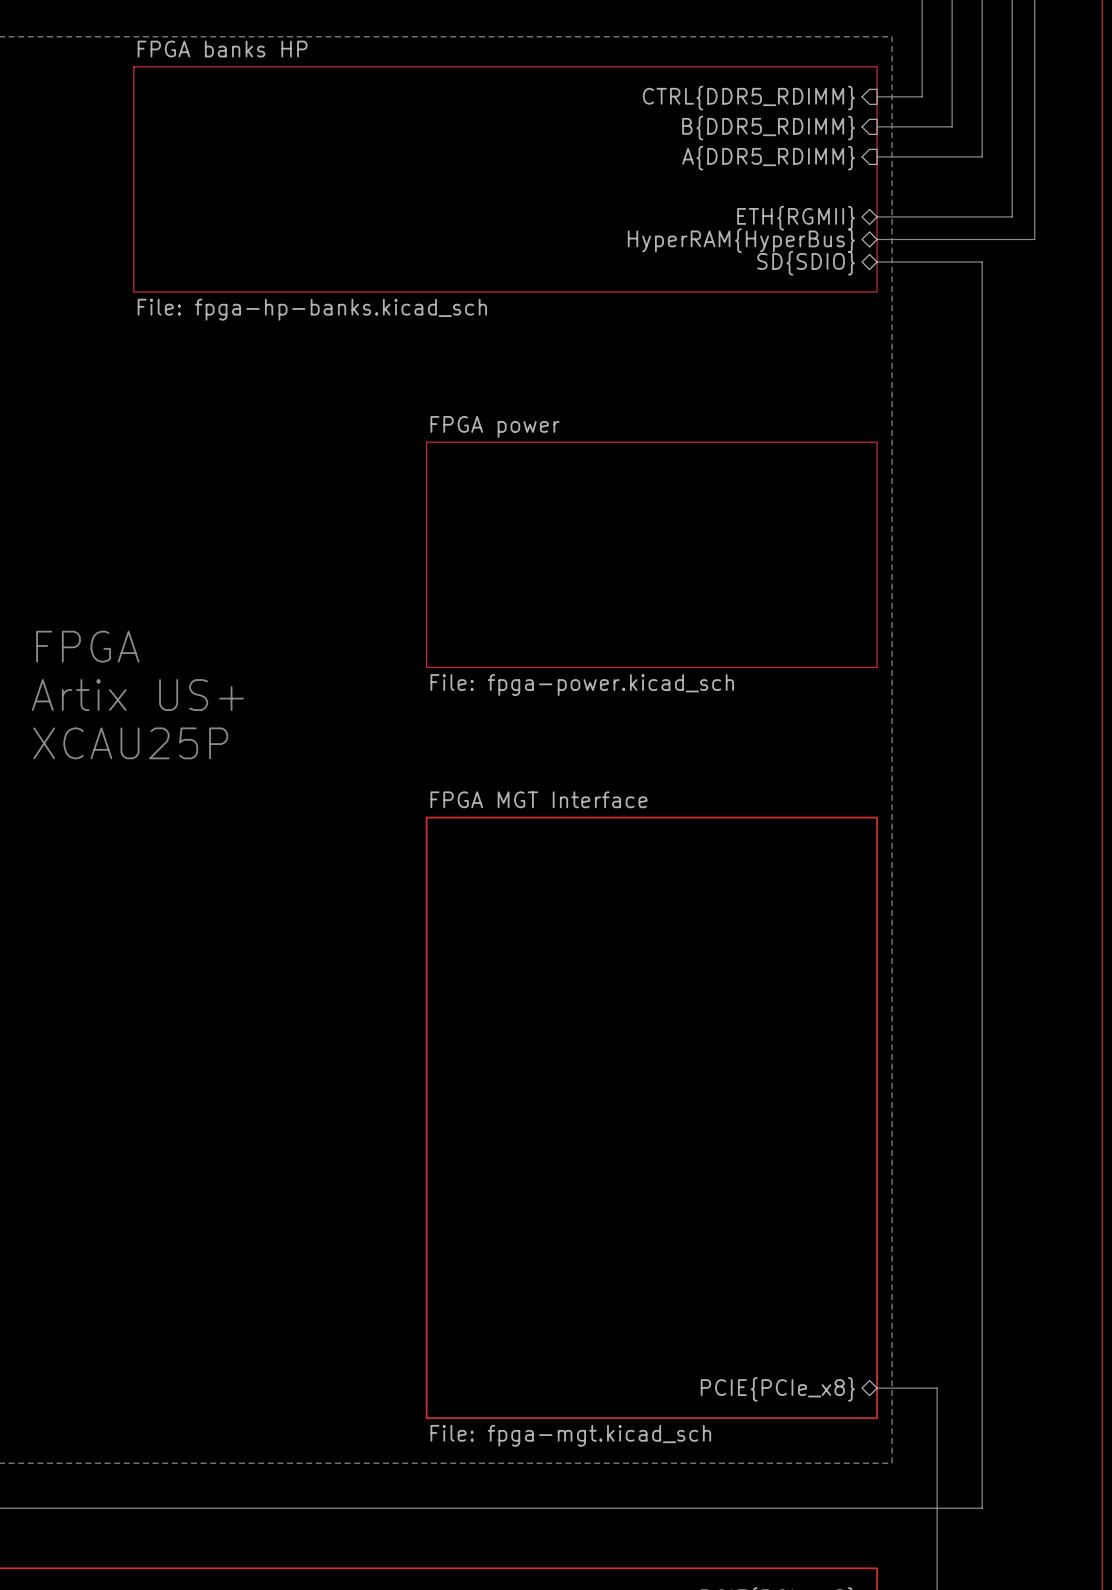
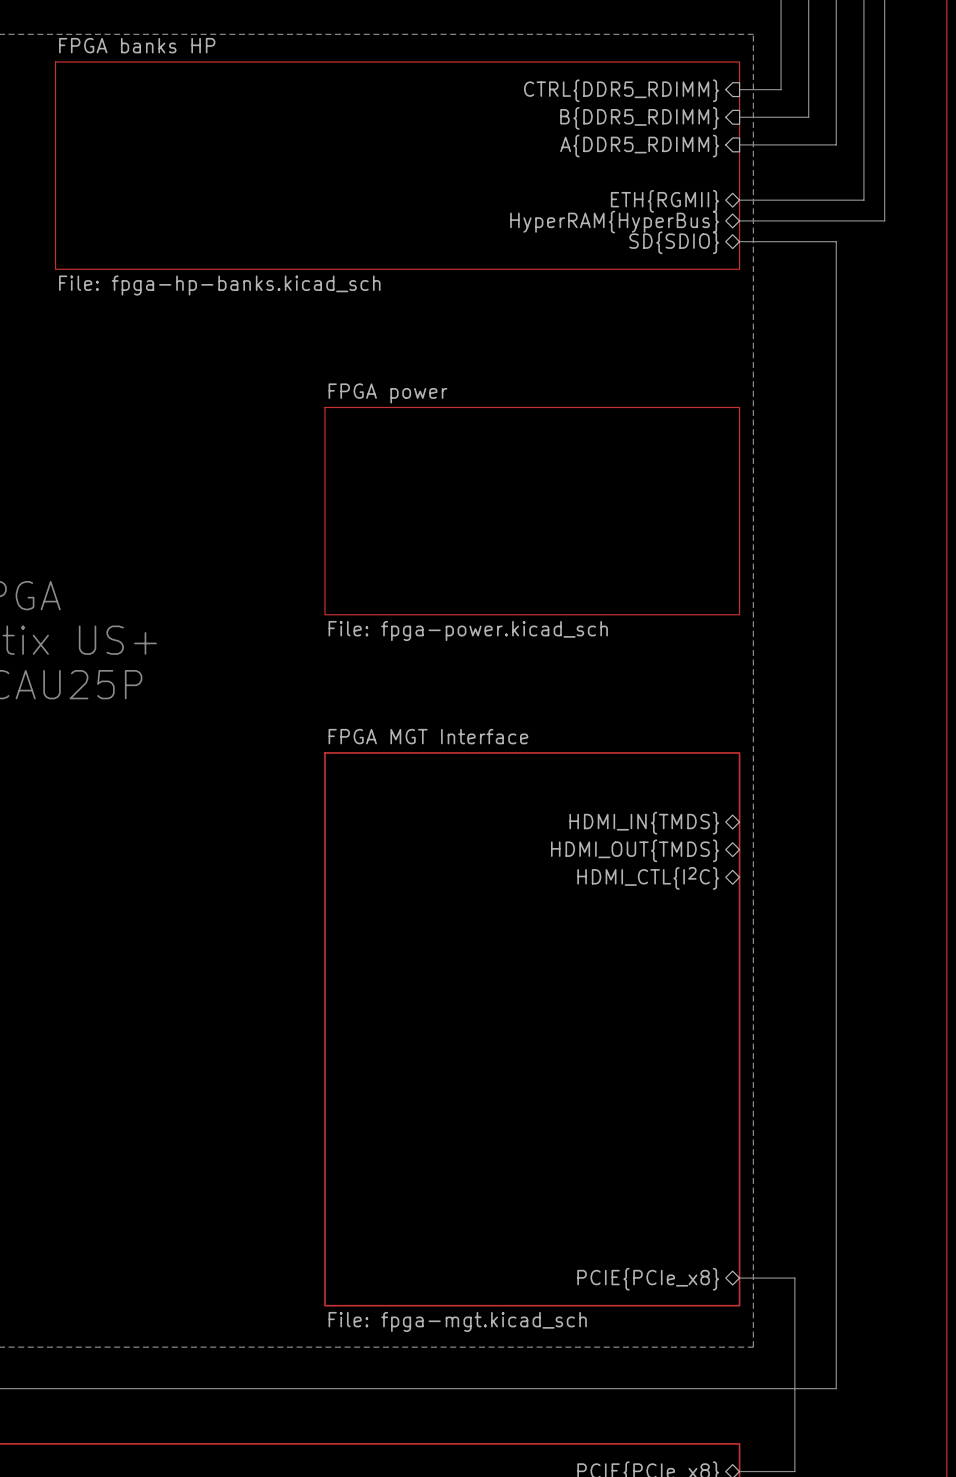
sheet pin: none -> HDMI_IN{TMDS} (644, 823)
sheet pin: none -> HDMI_OUT{TMDS} (635, 850)
sheet pin: none -> HDMI_CTL{I2C} (648, 878)

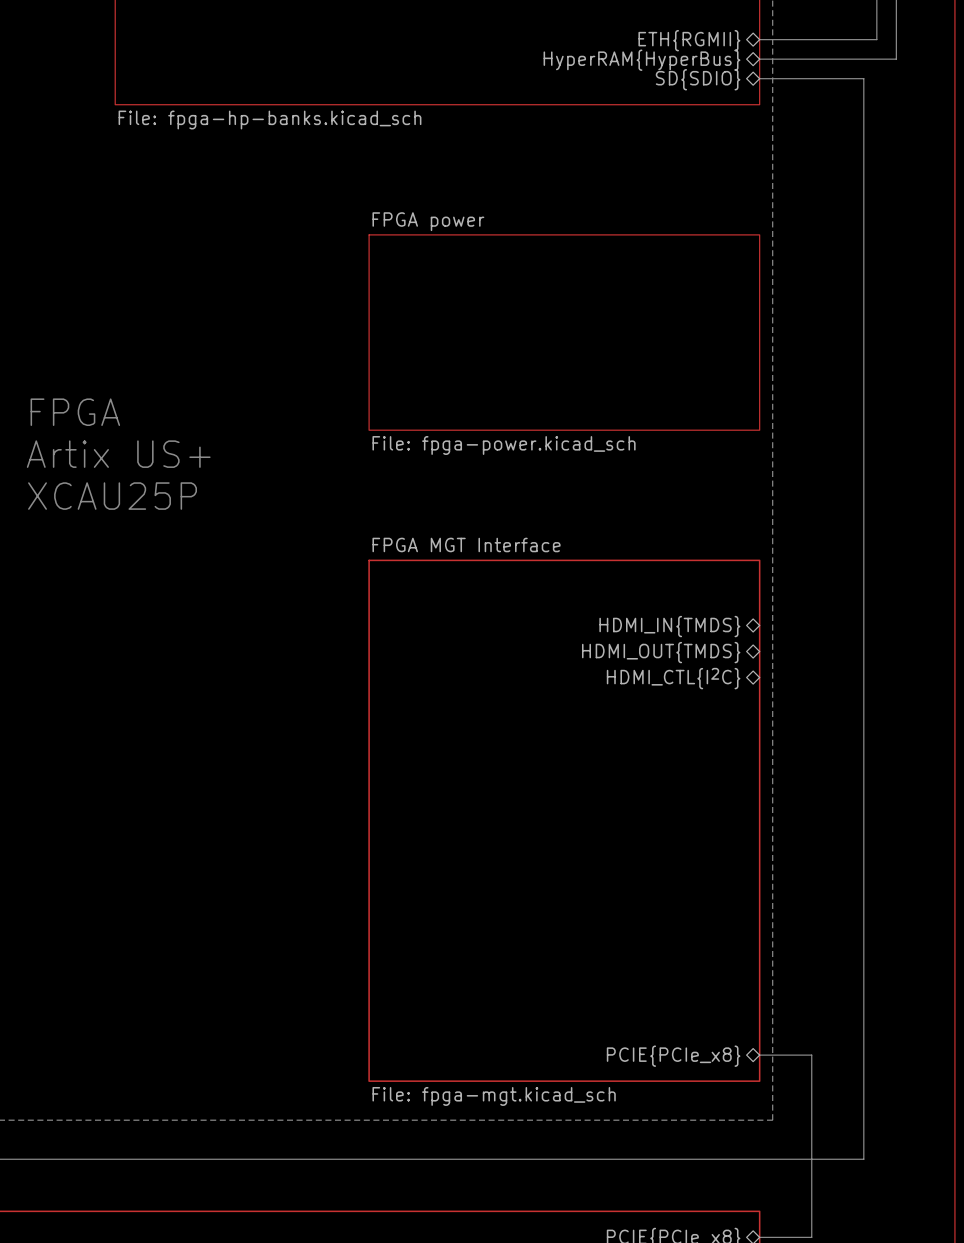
bus: (836, 241) (836, 1388) -> (850, 78) (863, 78) (863, 1159) (850, 1159)

